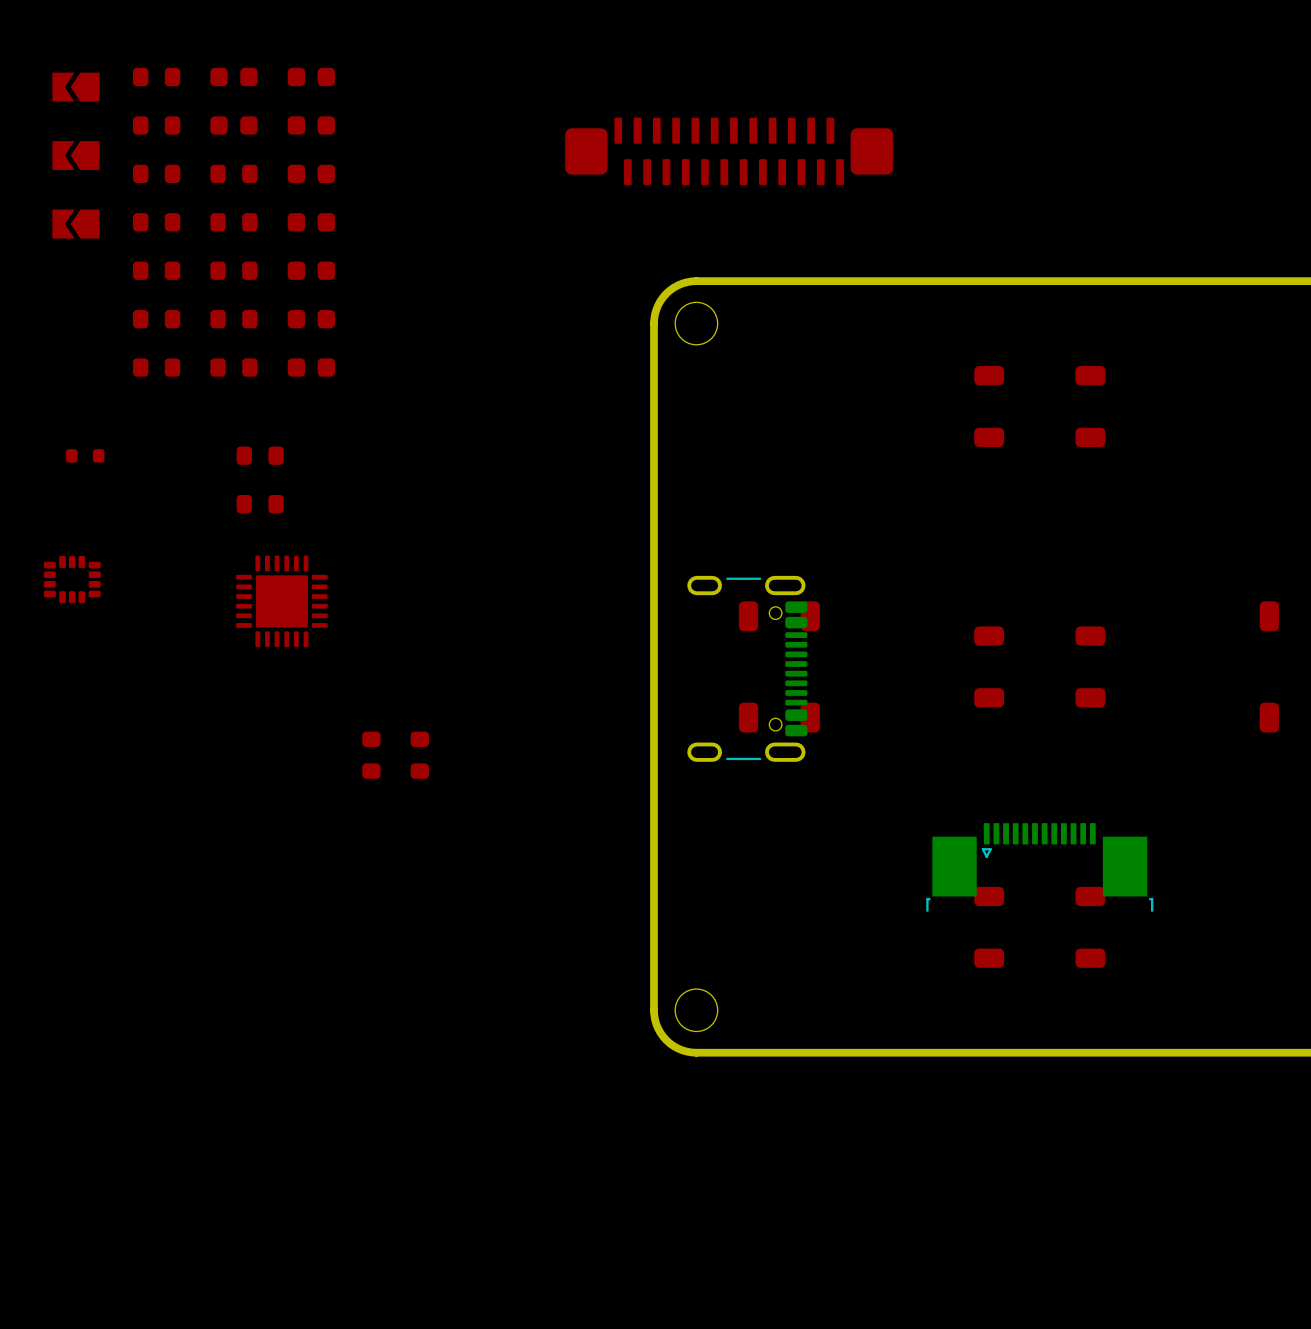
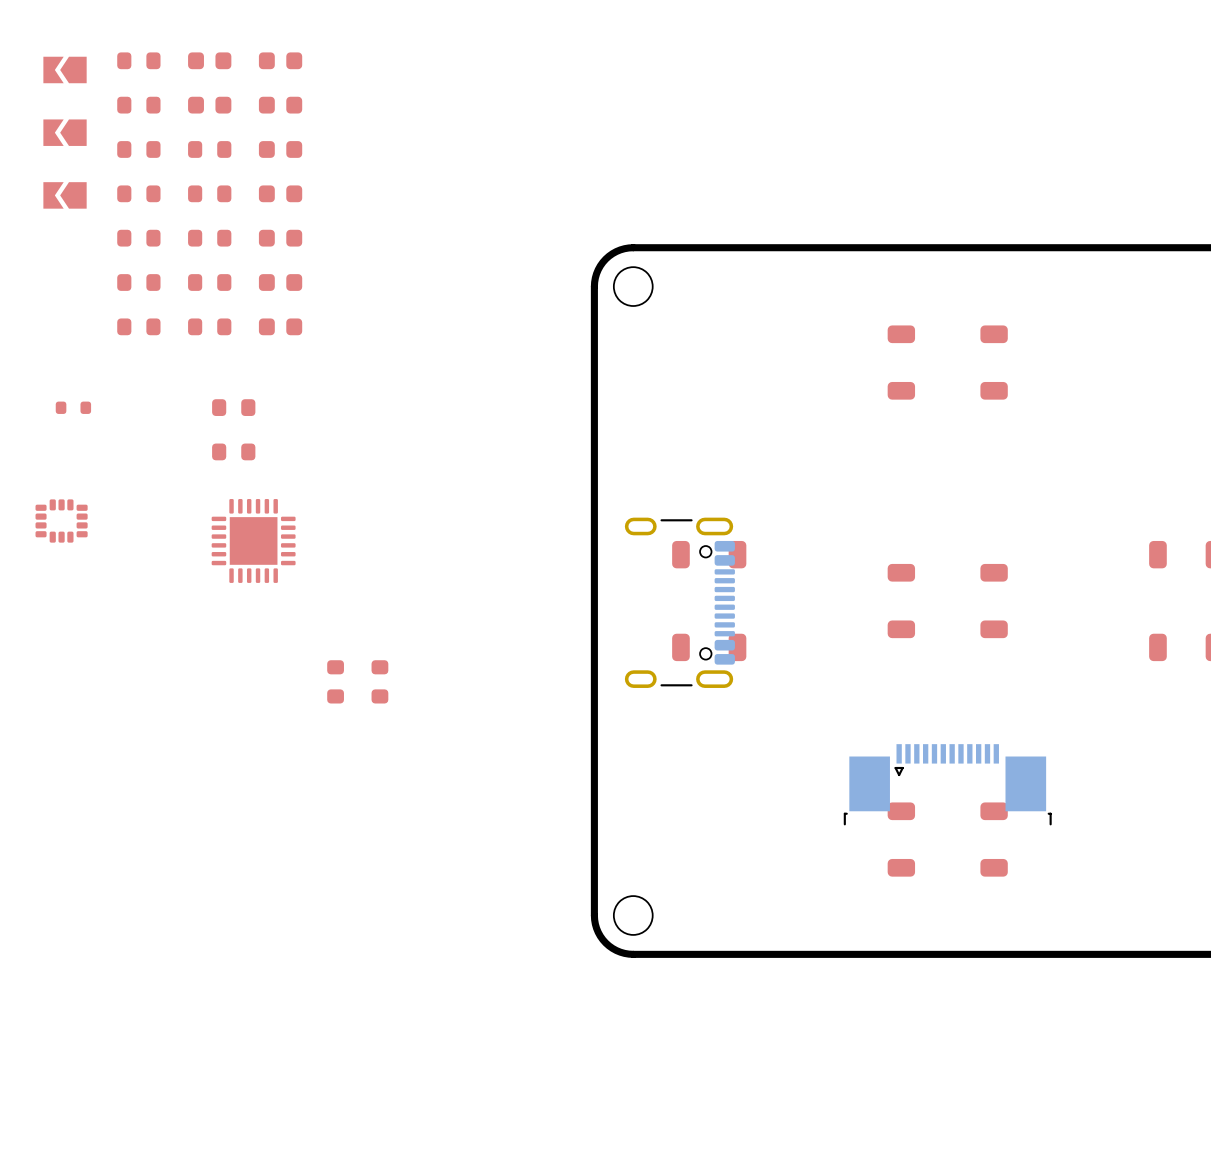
part: (729, 151) -> none

